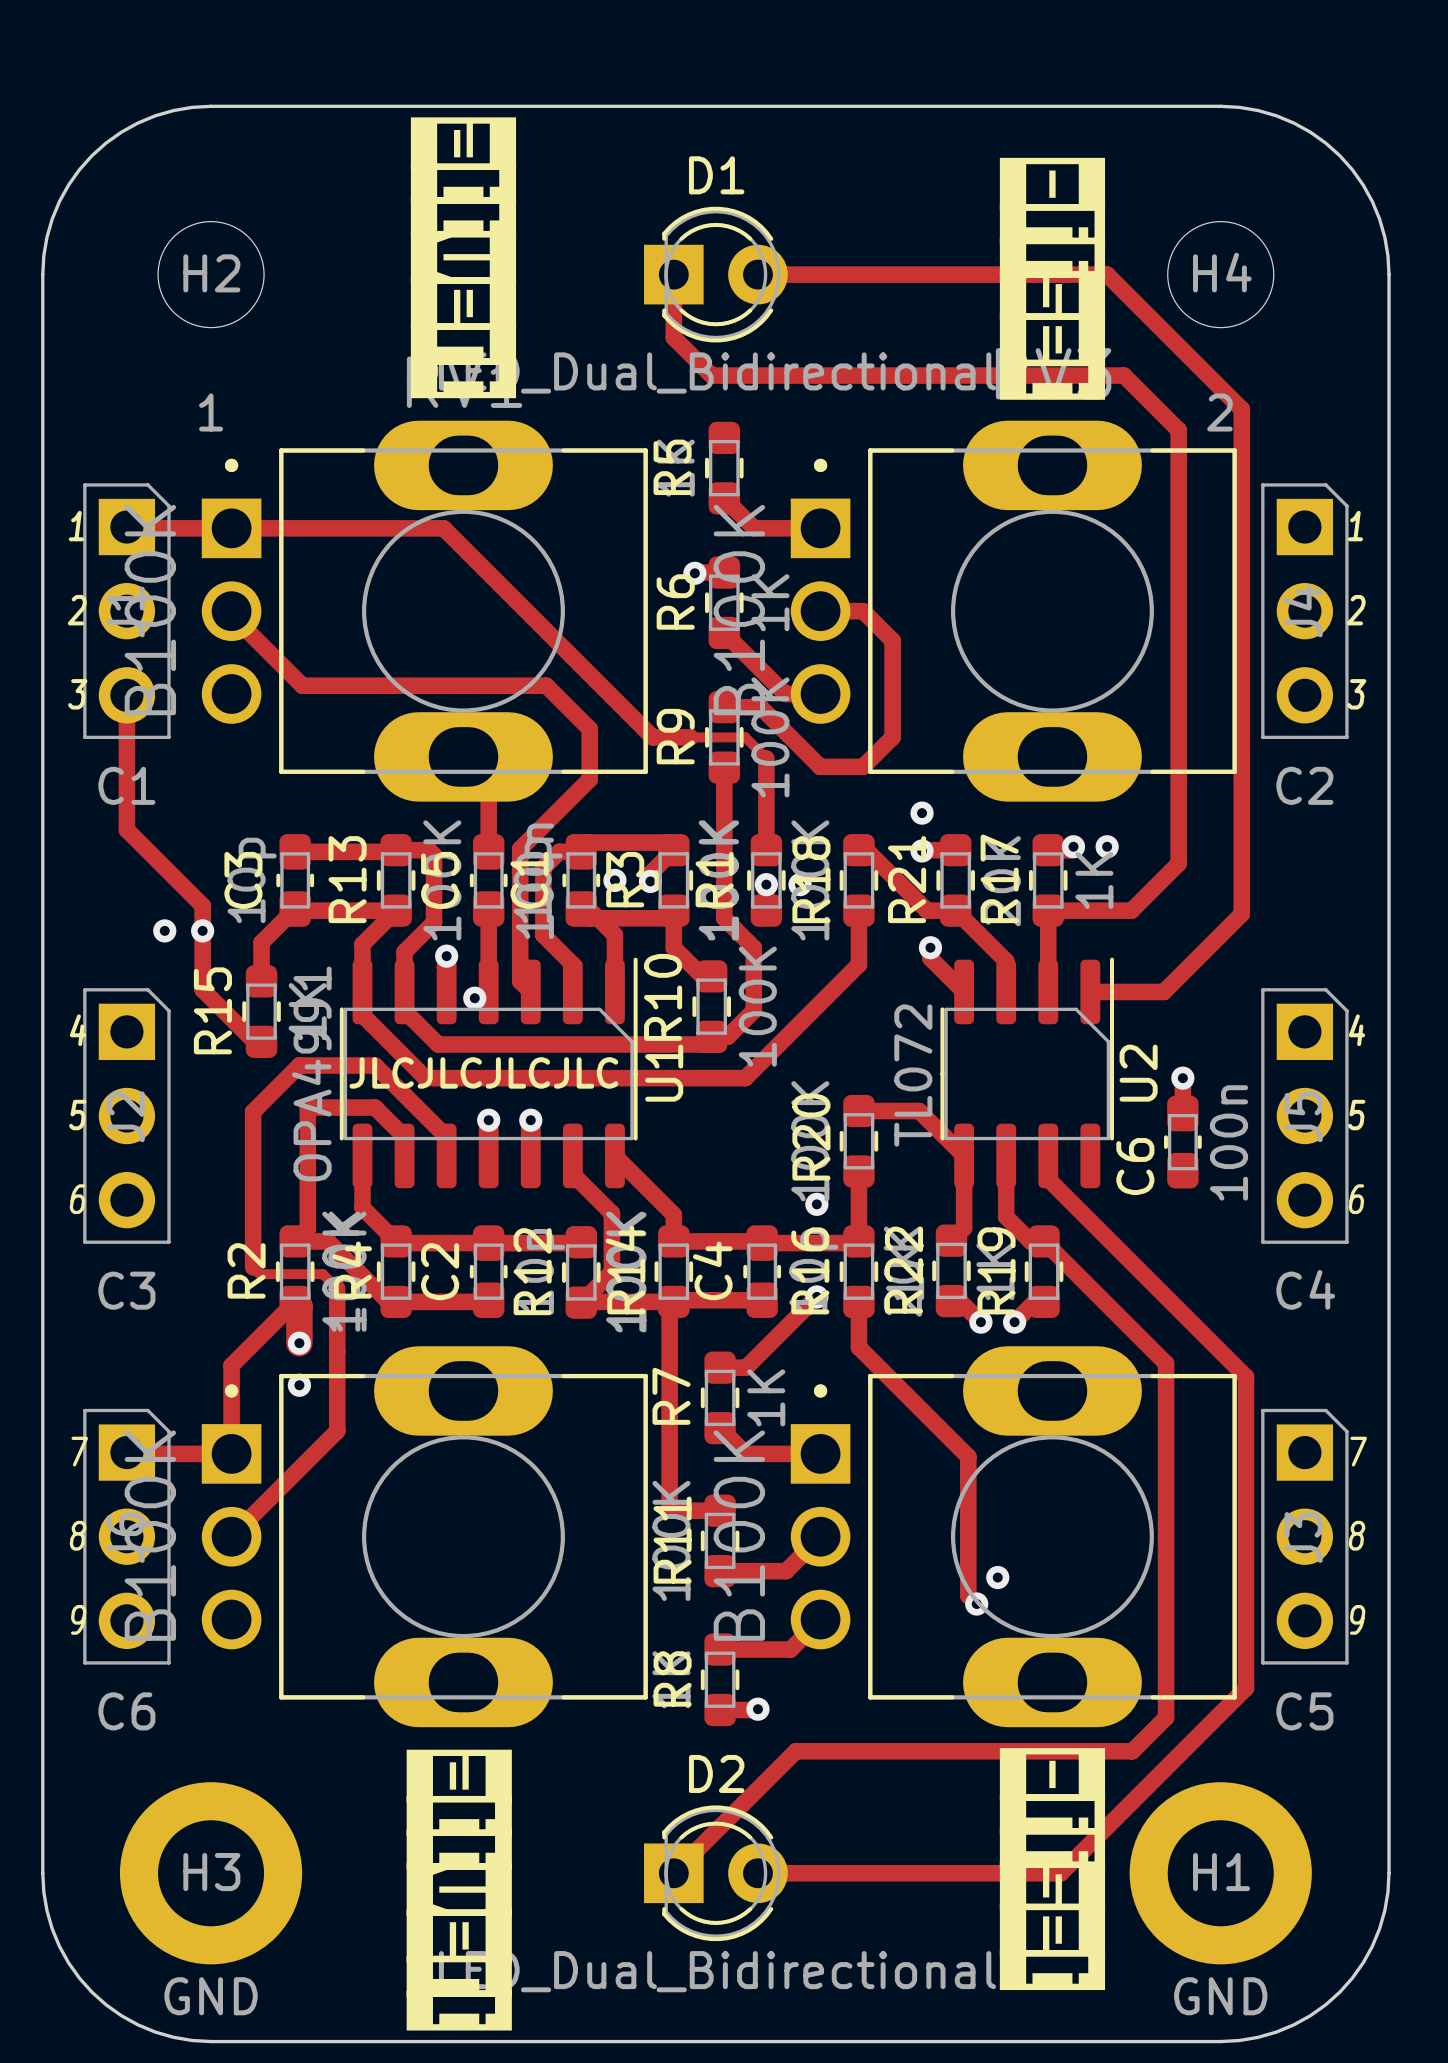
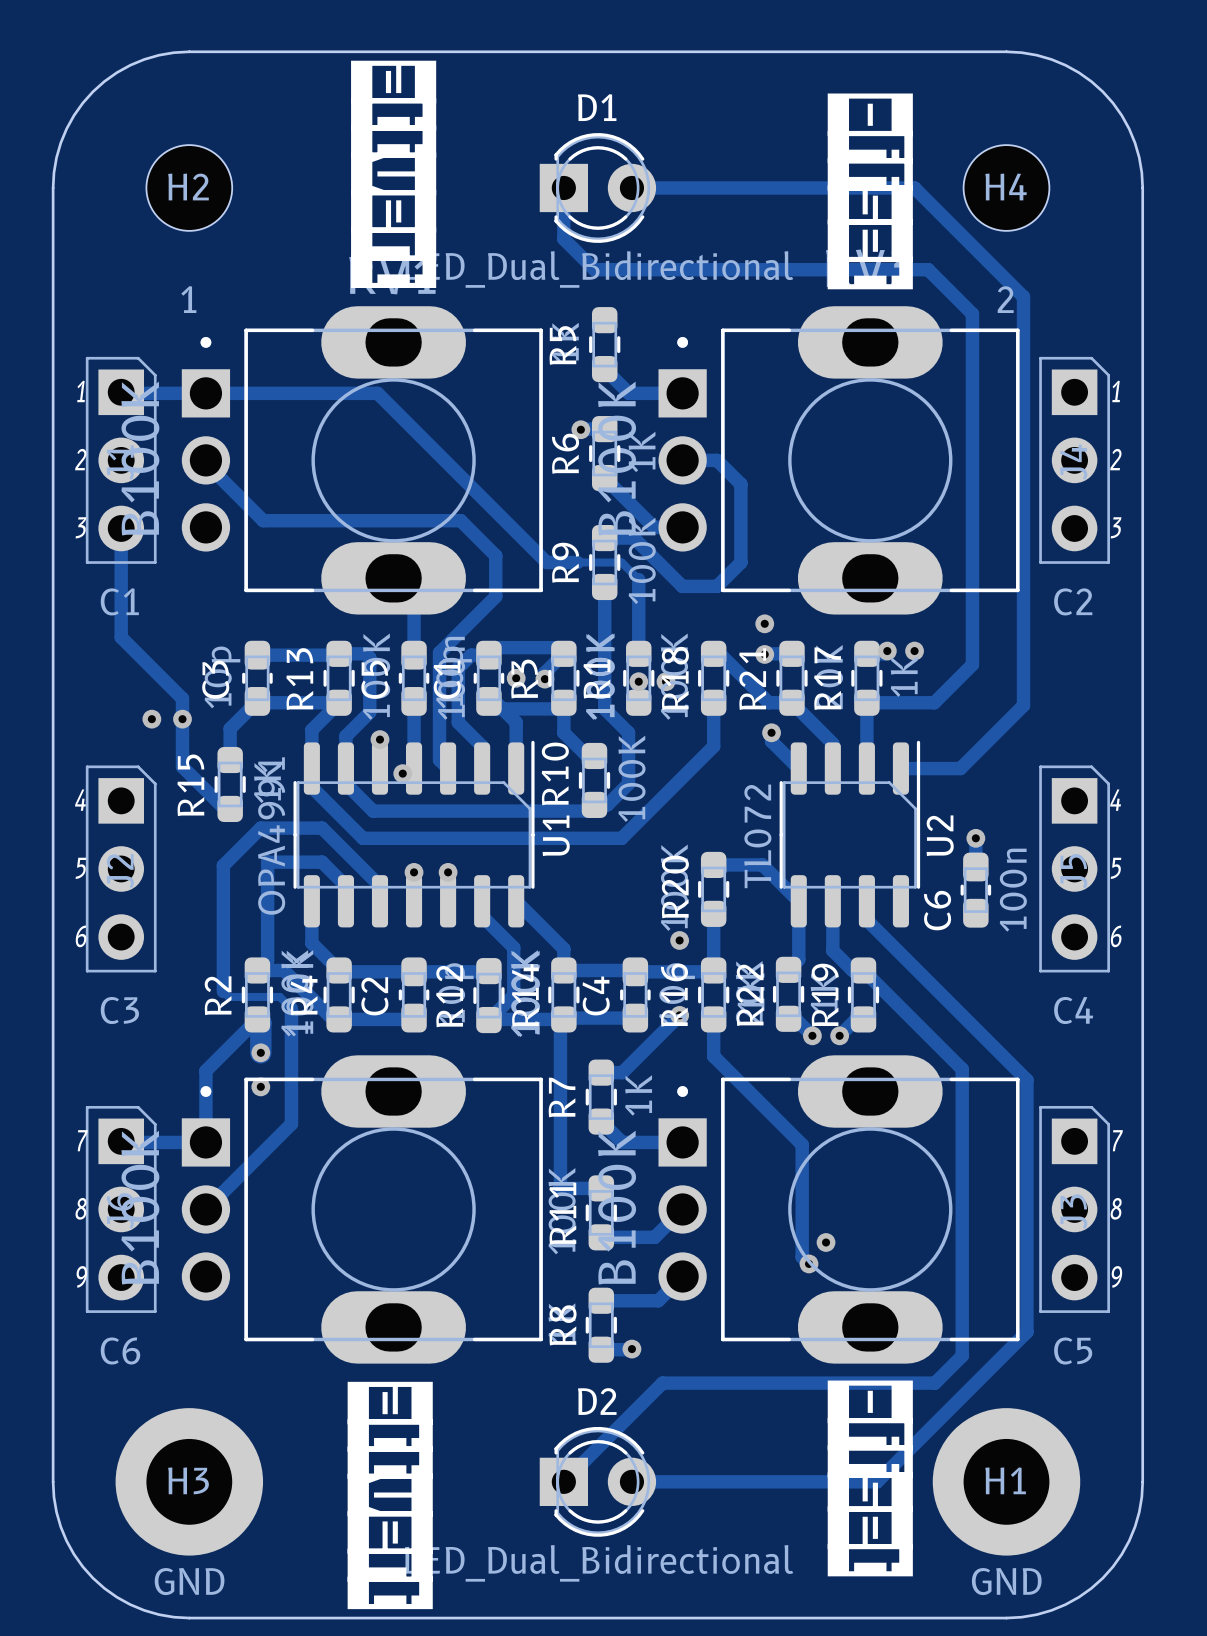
text: JLCJLCJLCJLC (483, 1072) -> none

